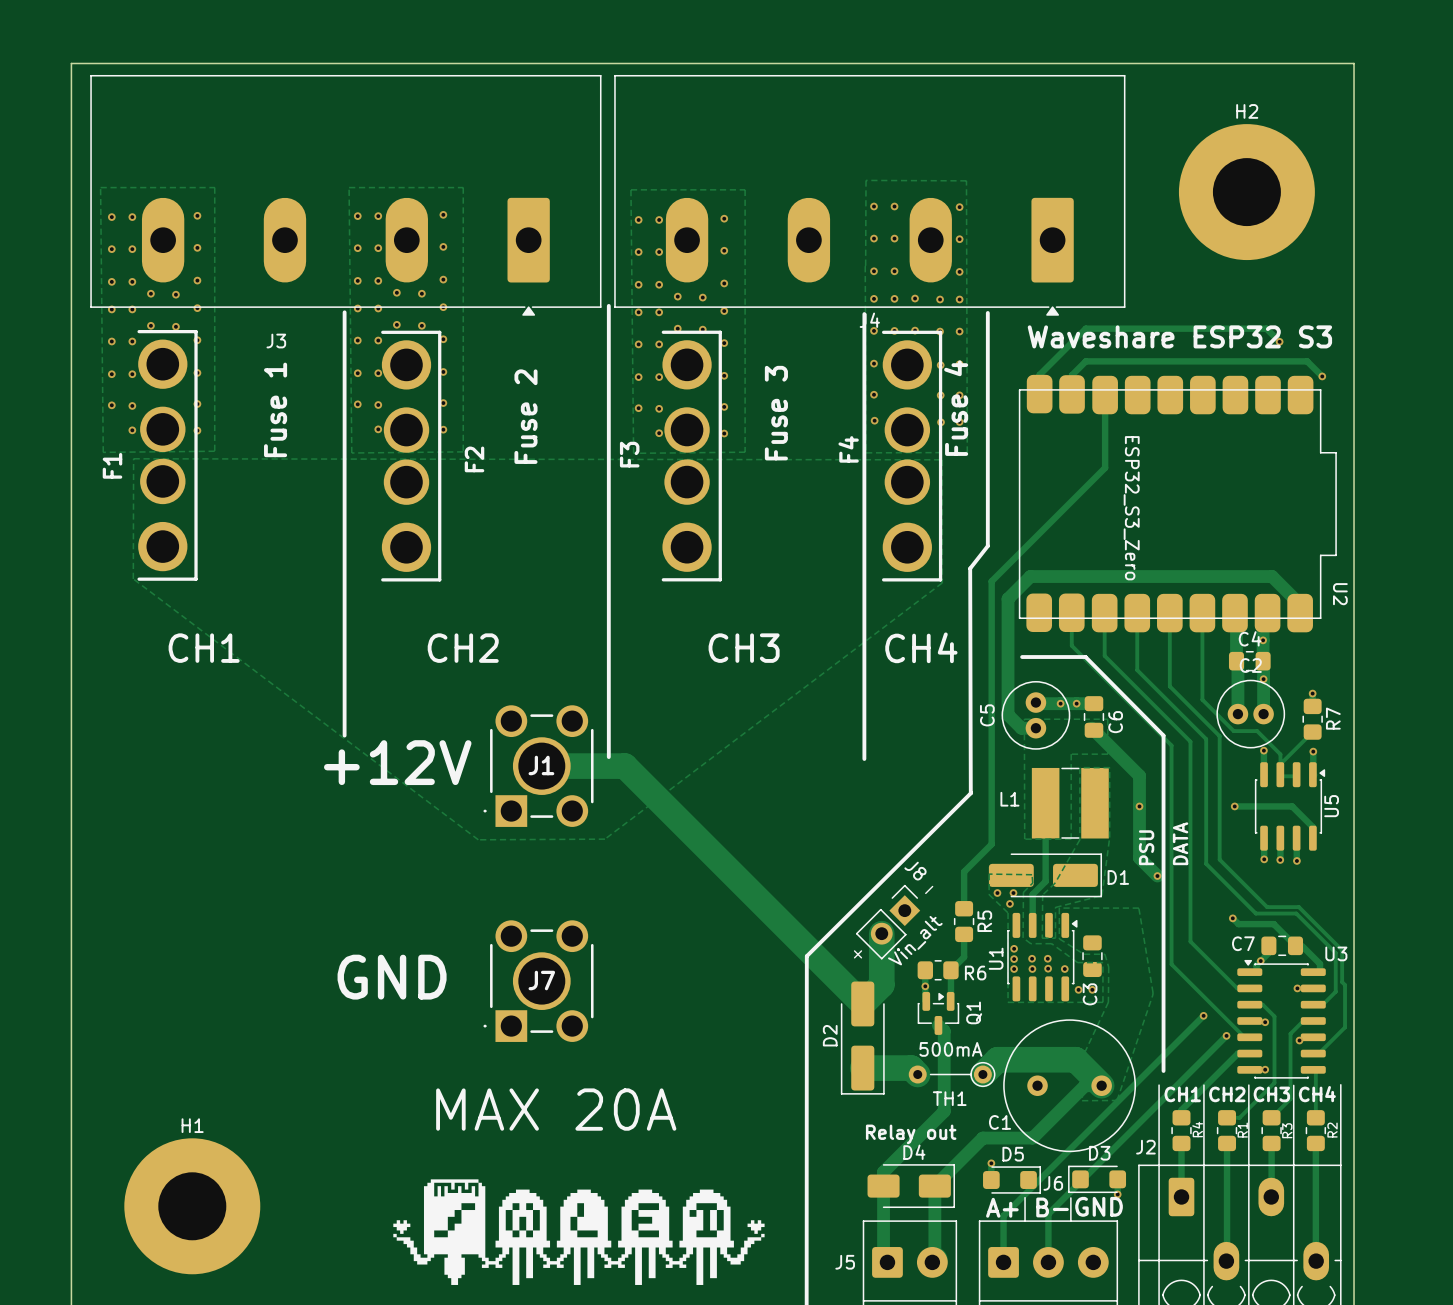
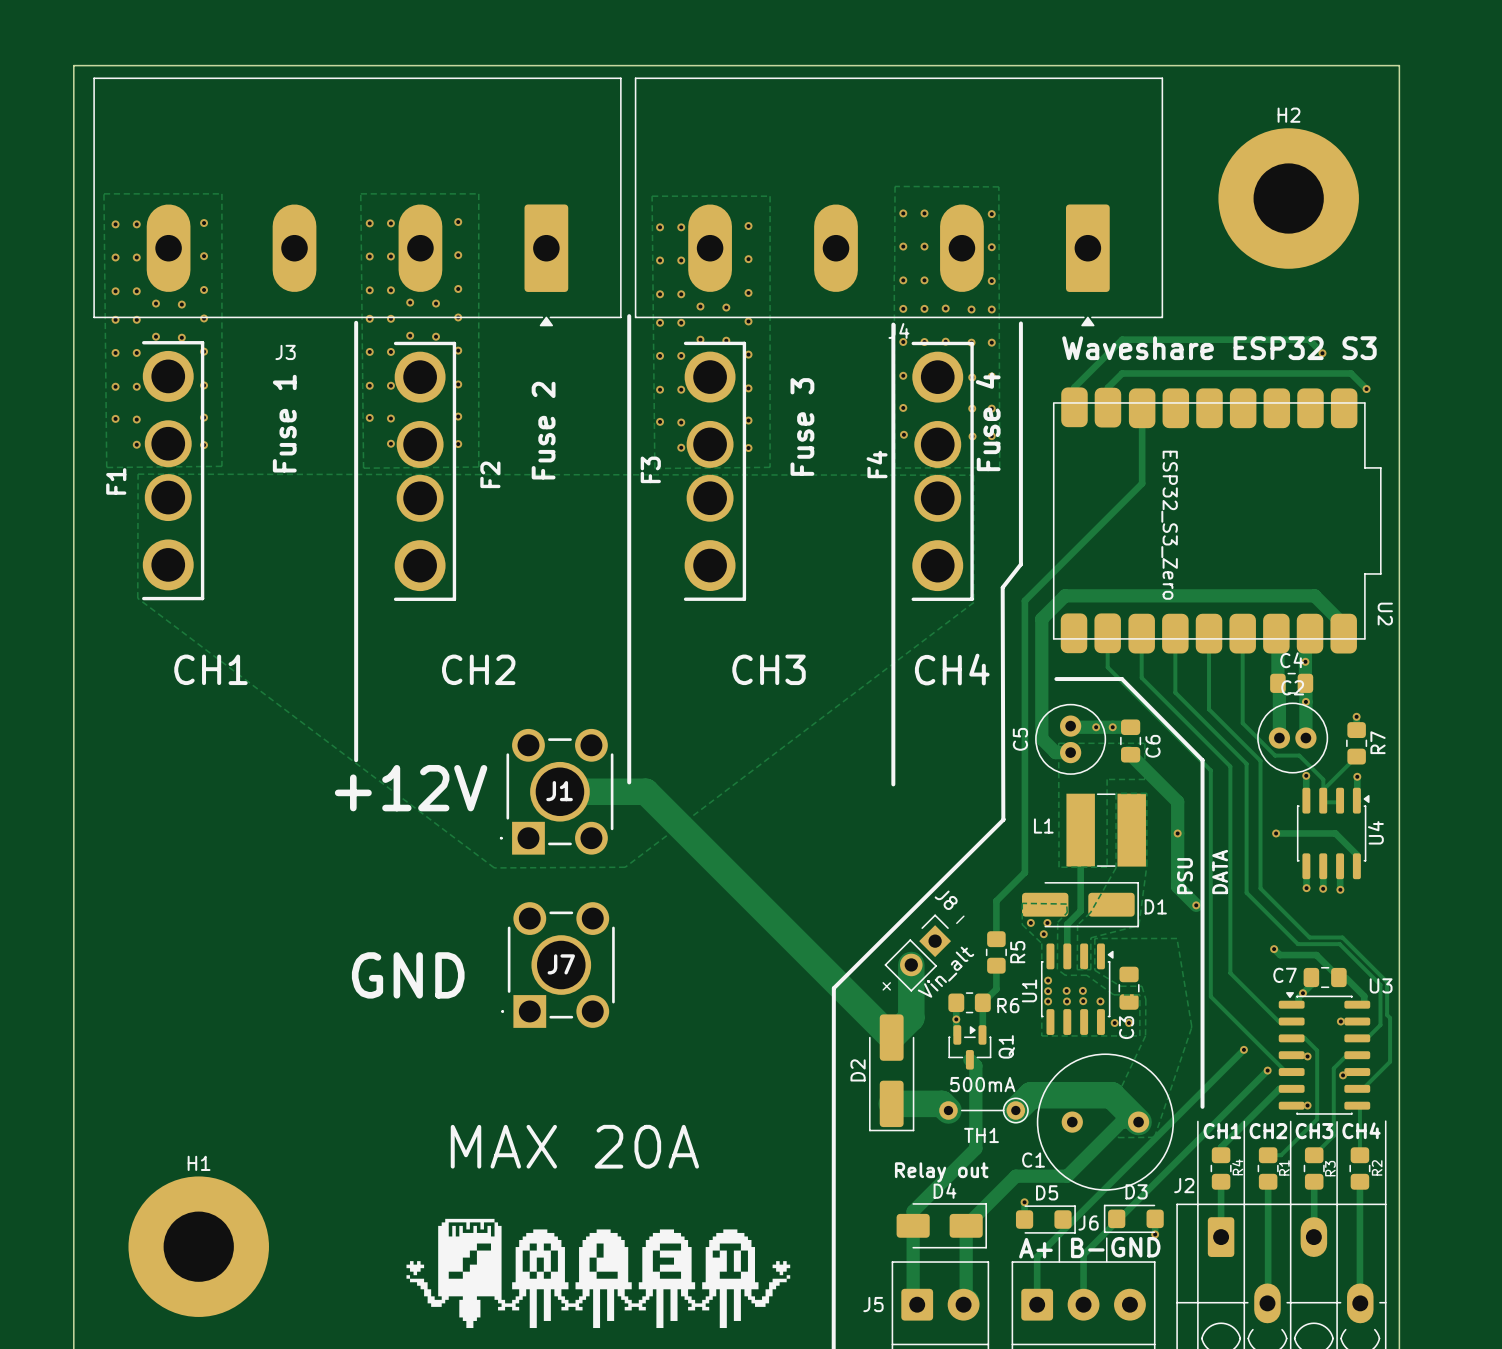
U5 name: U5 (1331, 806) -> U4 (1375, 832)
text position: GND (392, 977) -> GND (408, 975)
J7 position: (538, 981) -> (558, 965)

